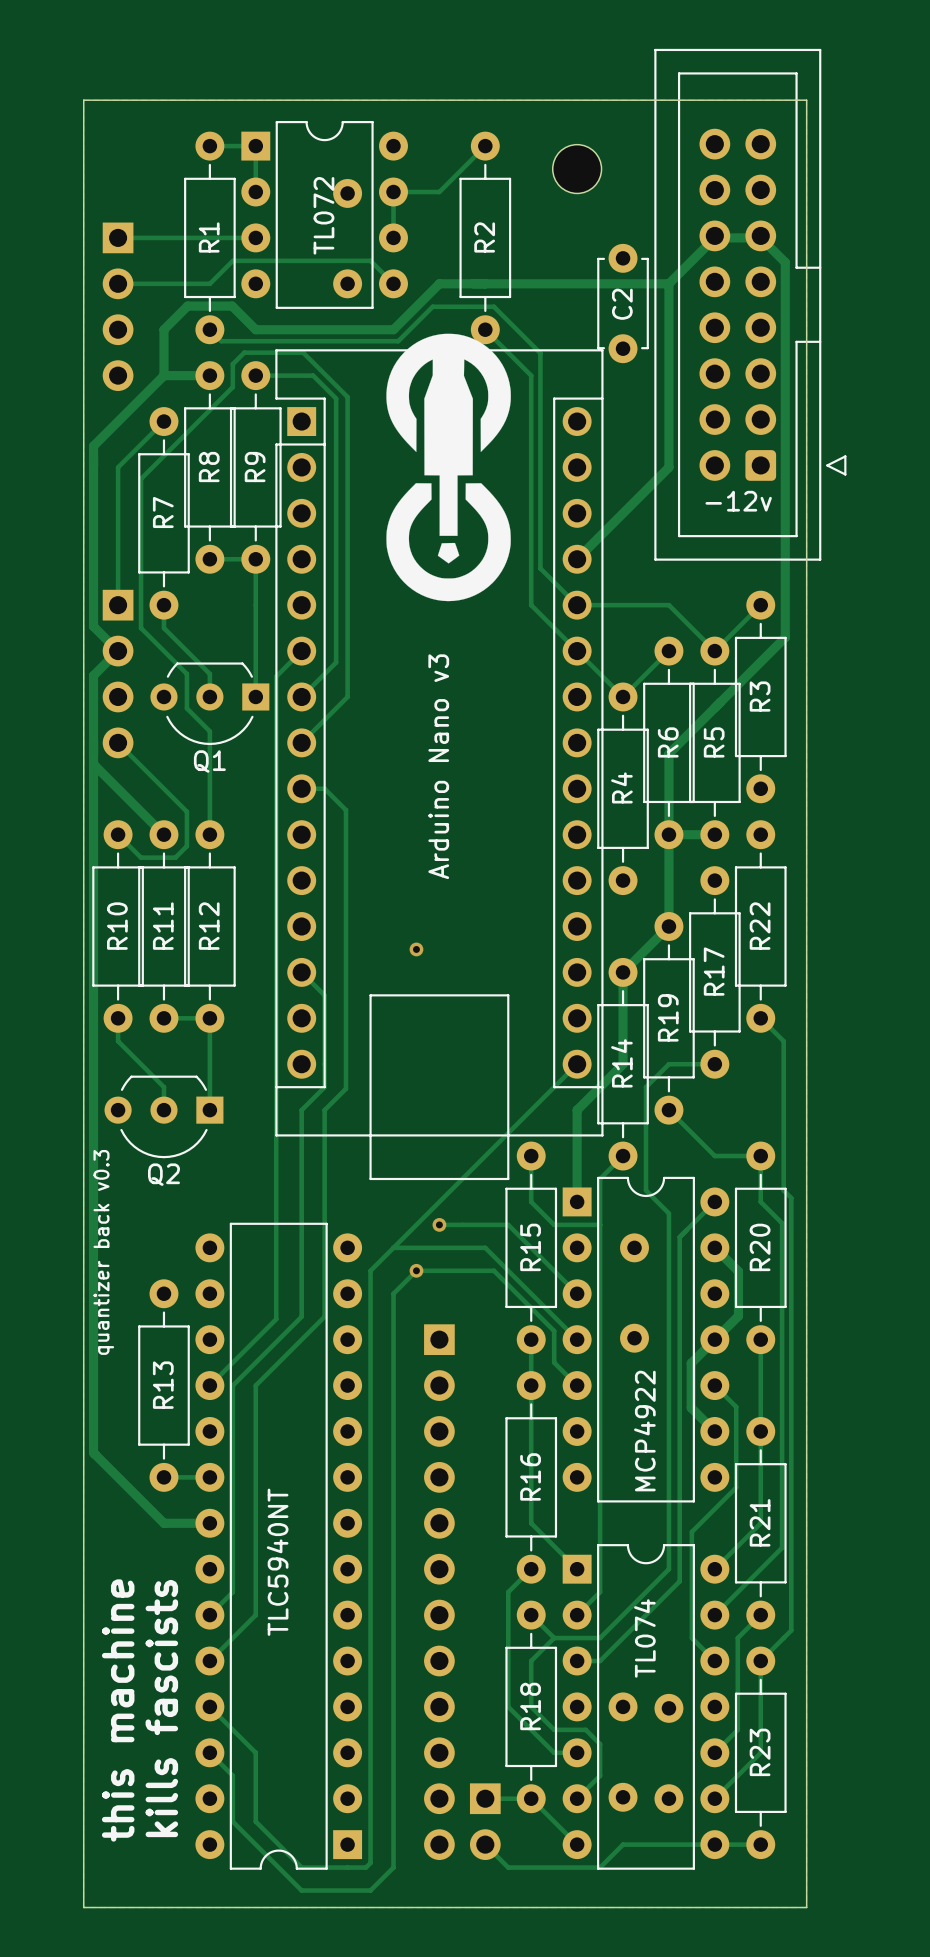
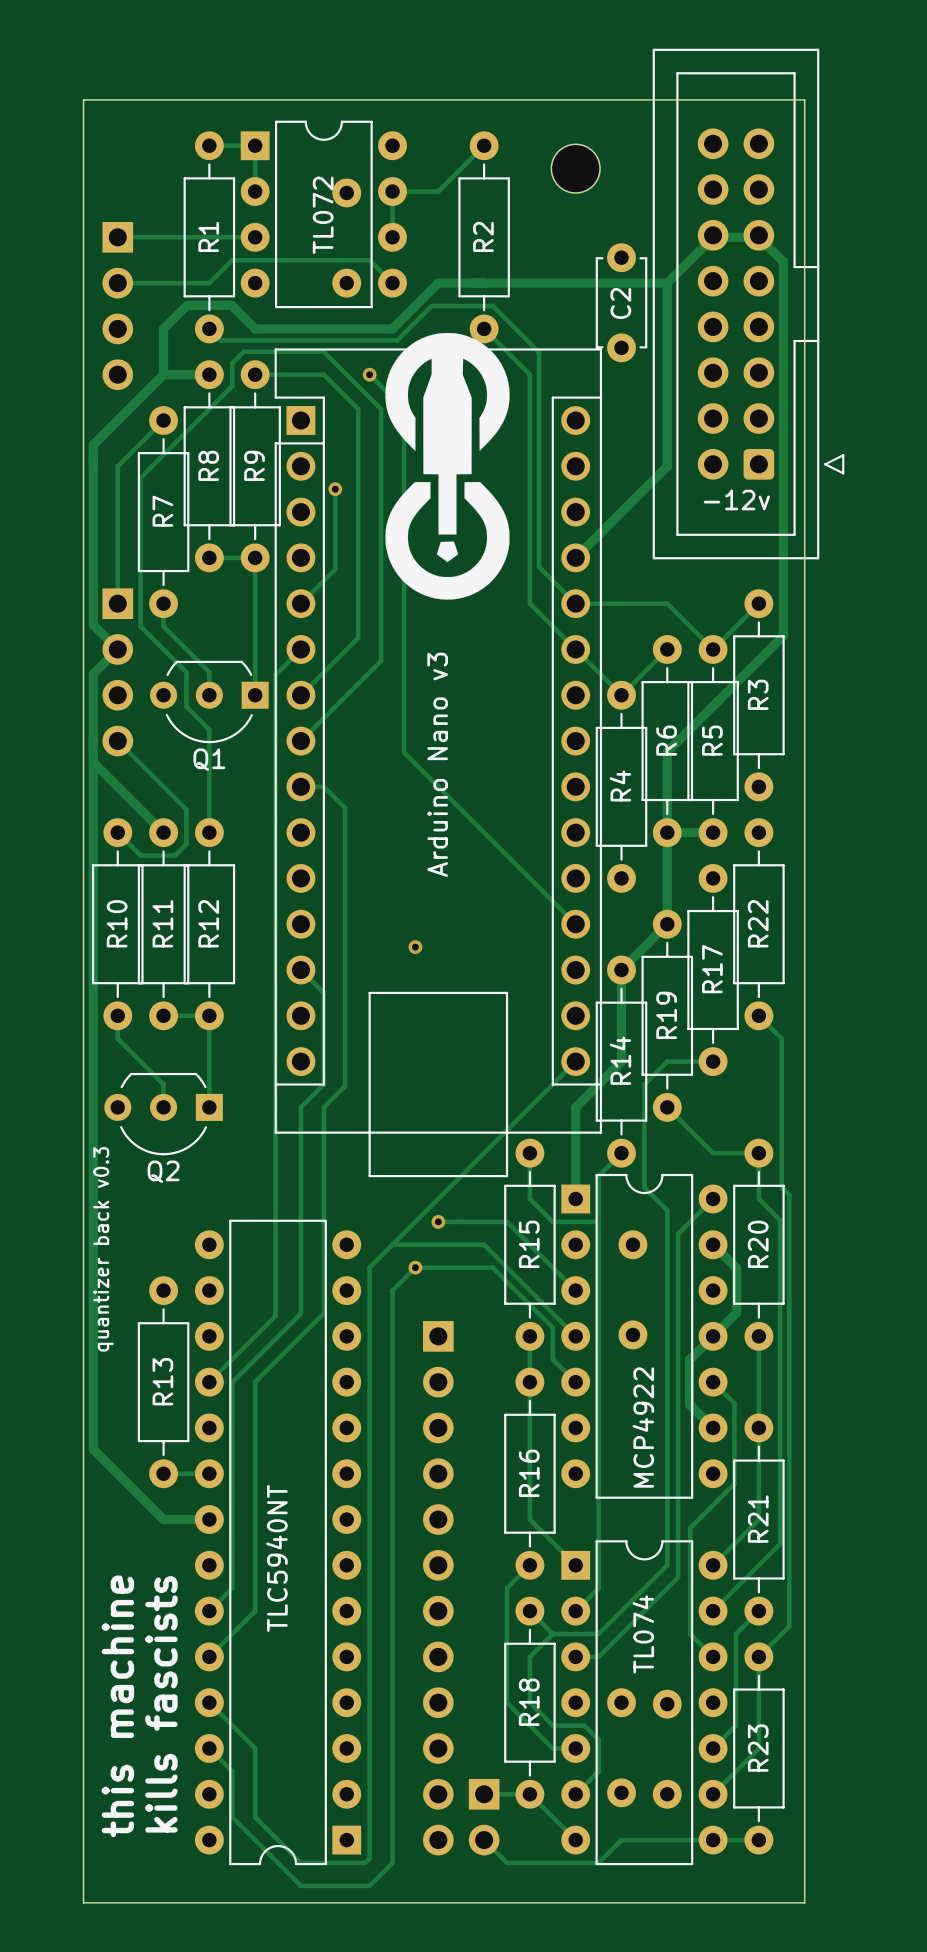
track: (303, 352) (347, 397) (347, 696) -> (302, 351) (323, 351) (381, 409) (381, 660) (346, 695)
track: (313, 375) (336, 398) (336, 490) -> (312, 374) (323, 374) (358, 409) (358, 638) (335, 660)
track: none -> (369, 374) (403, 409) (403, 752) (575, 924)
via: none -> (369, 374)
via: none -> (335, 489)
track: (336, 570) (336, 662) -> (335, 569) (300, 603)

